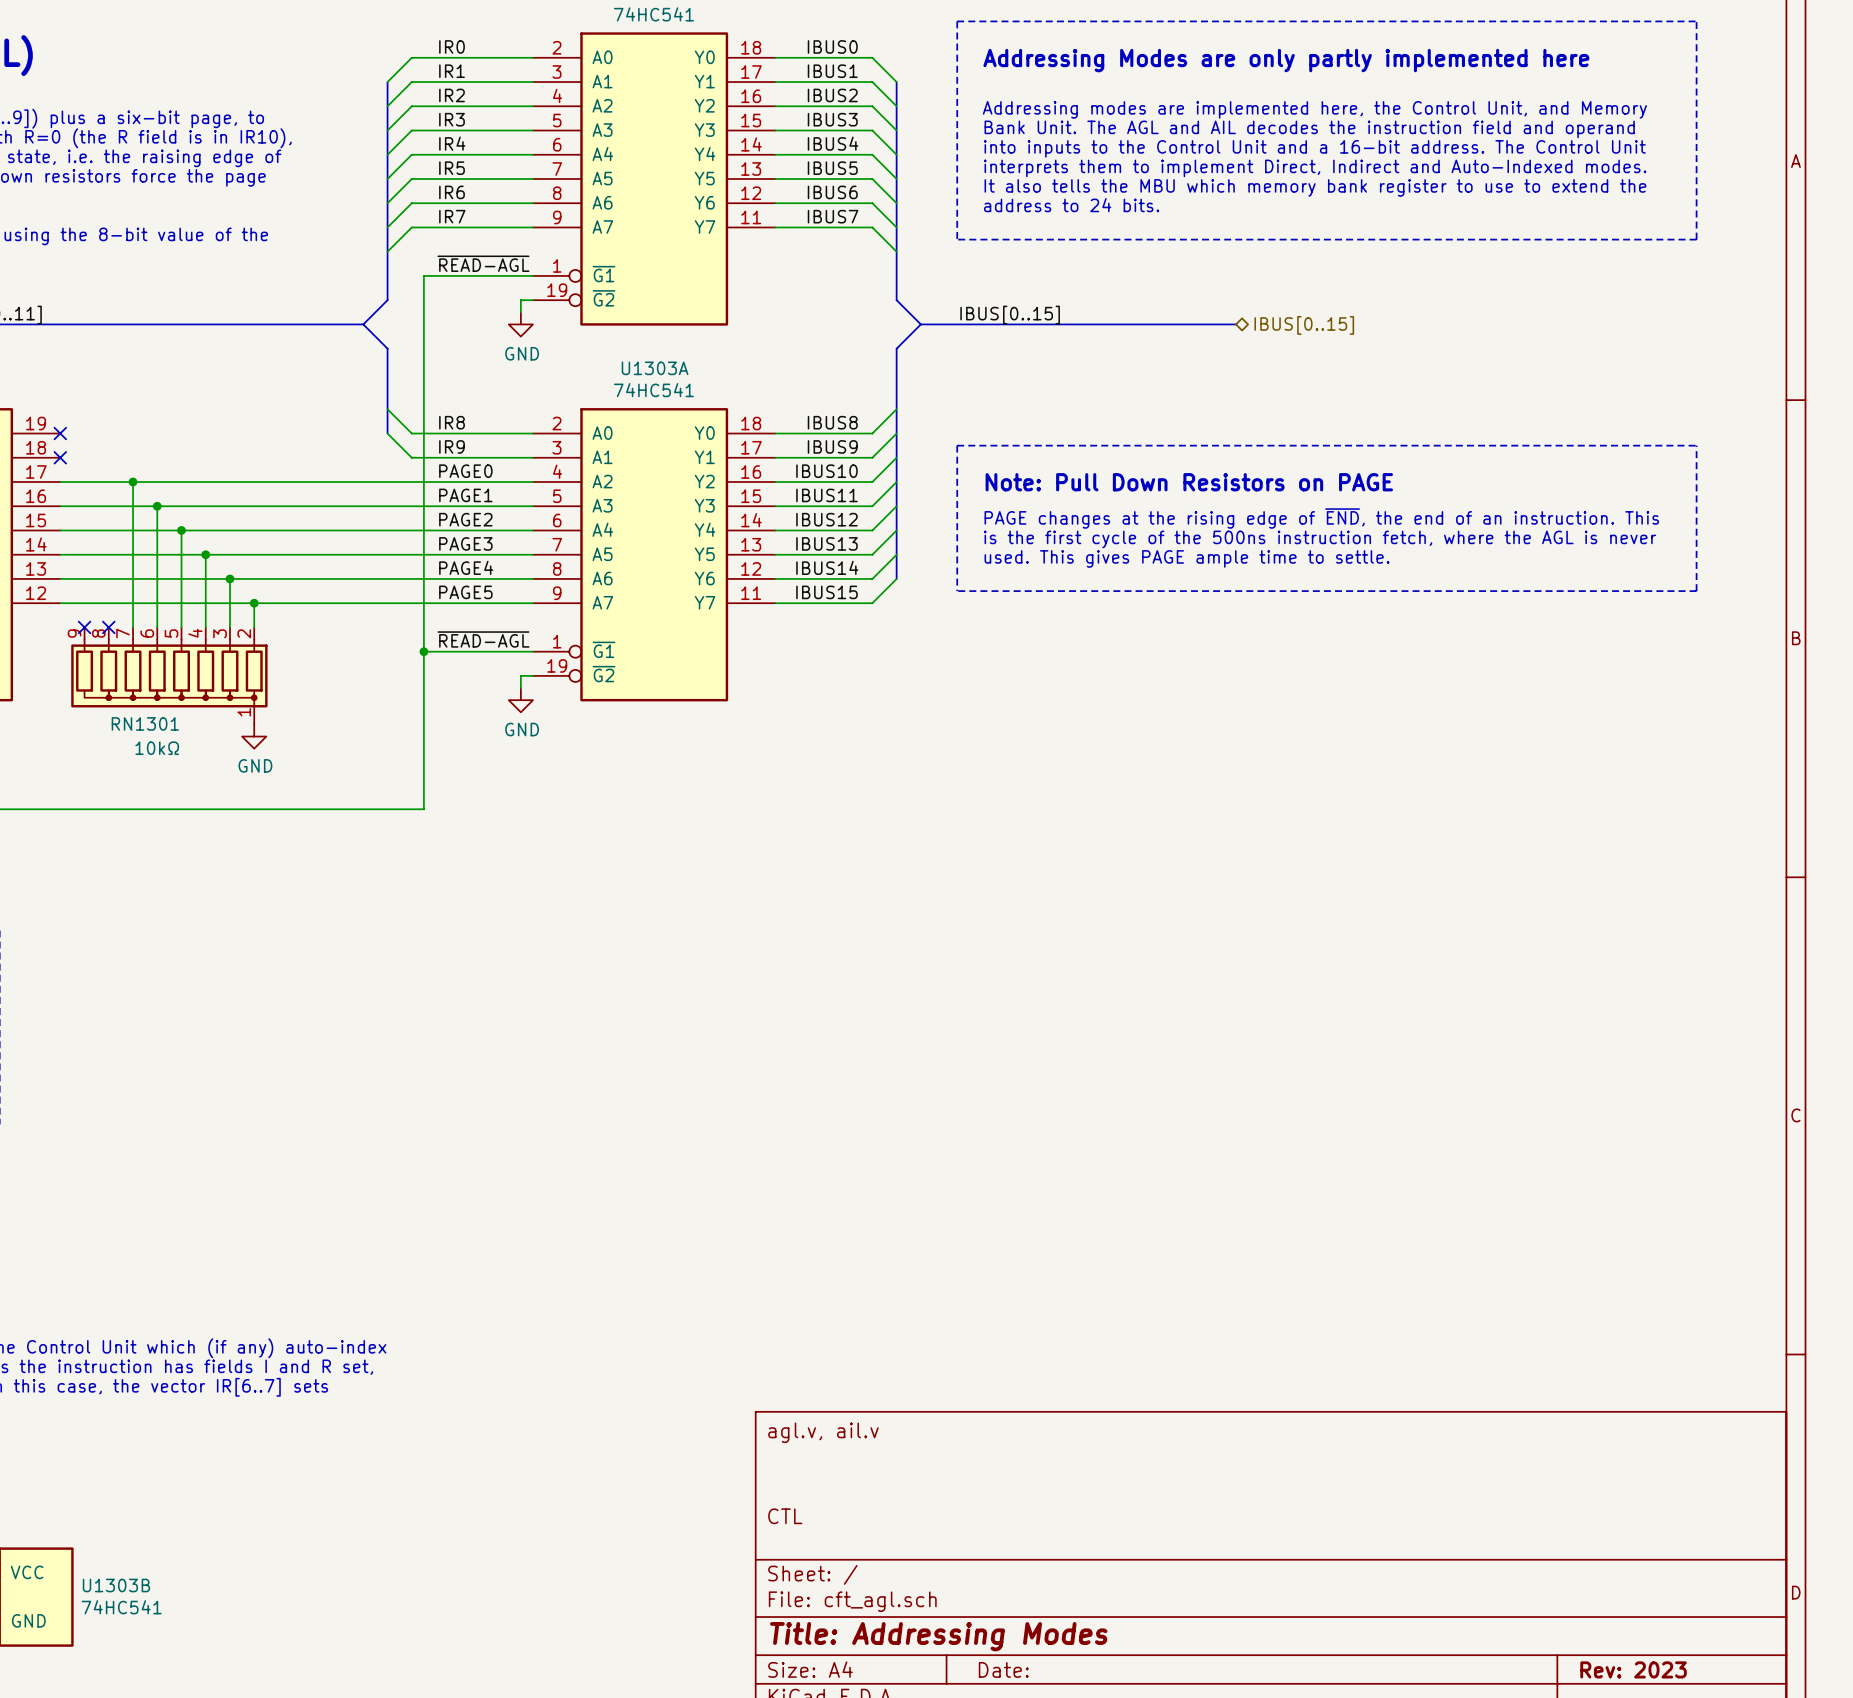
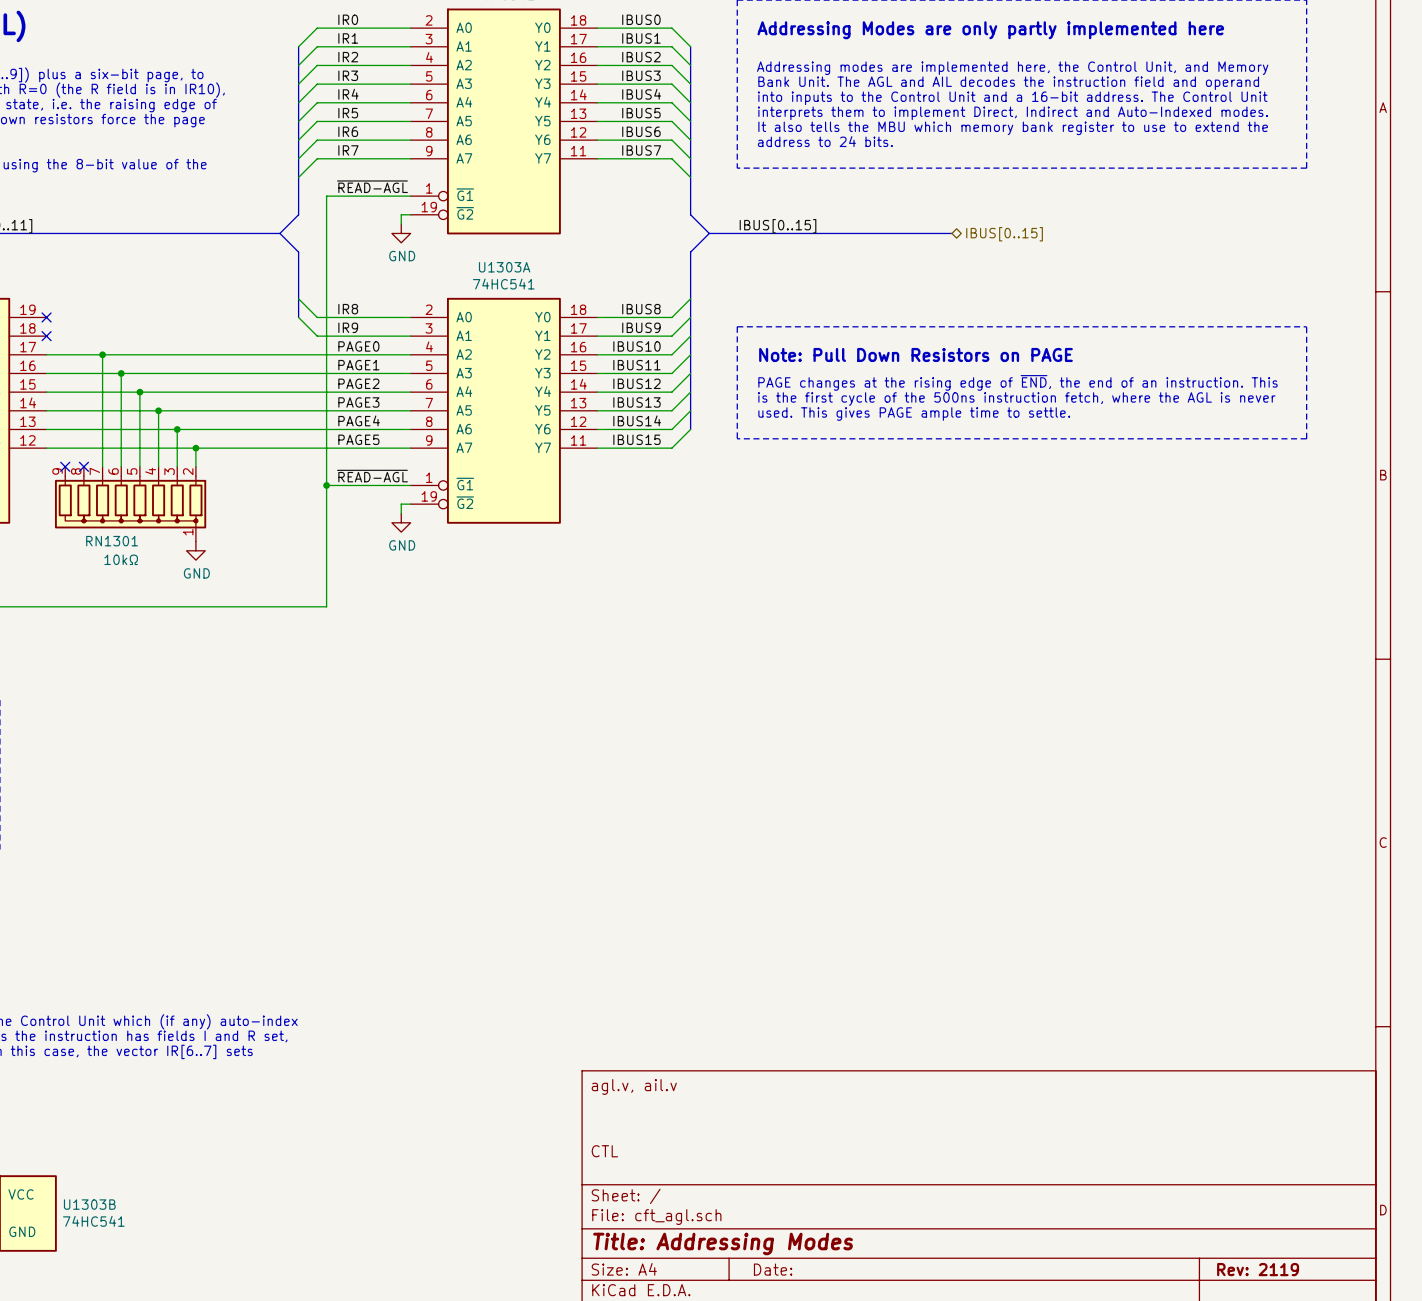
title block: Rev: 2023 (1633, 1669) -> Rev: 2119 (1258, 1269)

